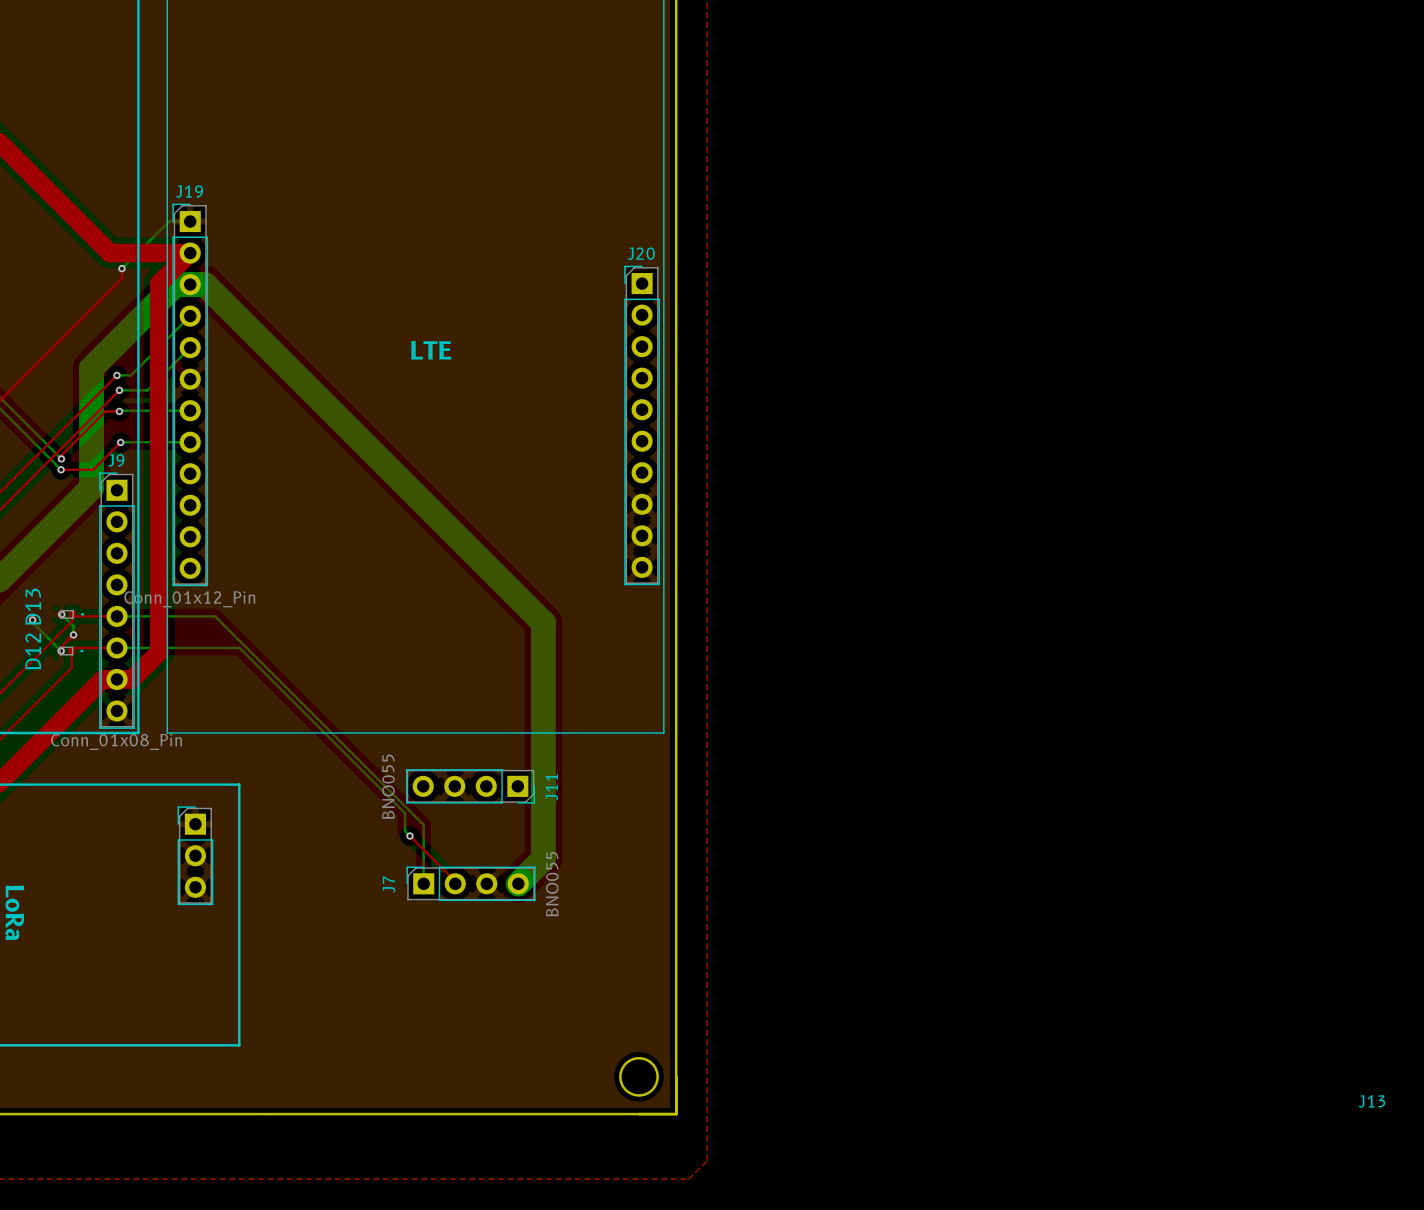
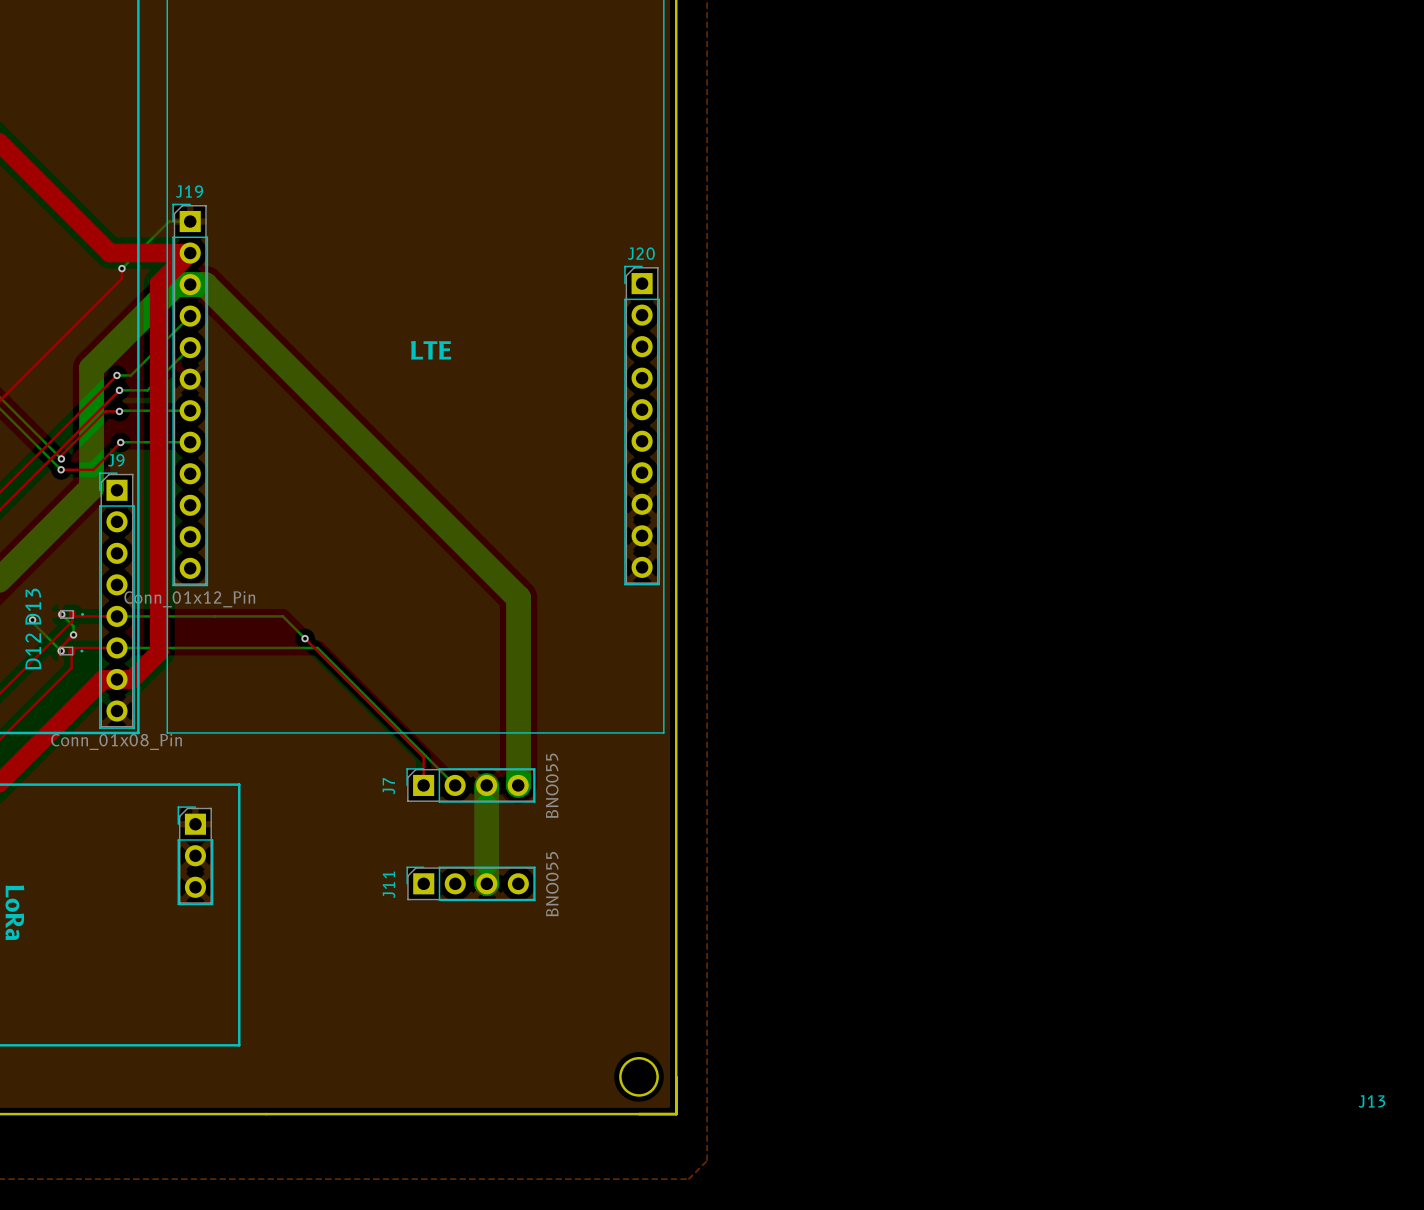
bottom track: (518, 598) (543, 622) (543, 858) (518, 884) -> (518, 598) (518, 785)
bottom track: (215, 616) (423, 824) (423, 884) -> (215, 616) (282, 616) (305, 638)
top track: none -> (305, 638) (423, 757) (423, 785)
via: none -> (305, 638)
bottom track: (239, 647) (404, 813) (404, 831) (409, 836) -> (239, 647) (317, 647) (455, 785)
J7: none -> BNO055 (470, 785)
bottom track: none -> (486, 785) (487, 883)
J11: BNO055 (470, 786) -> none
top track: (409, 836) (455, 881) -> none
via: (409, 836) -> none
J7 name: J7 (388, 884) -> J11 (388, 884)

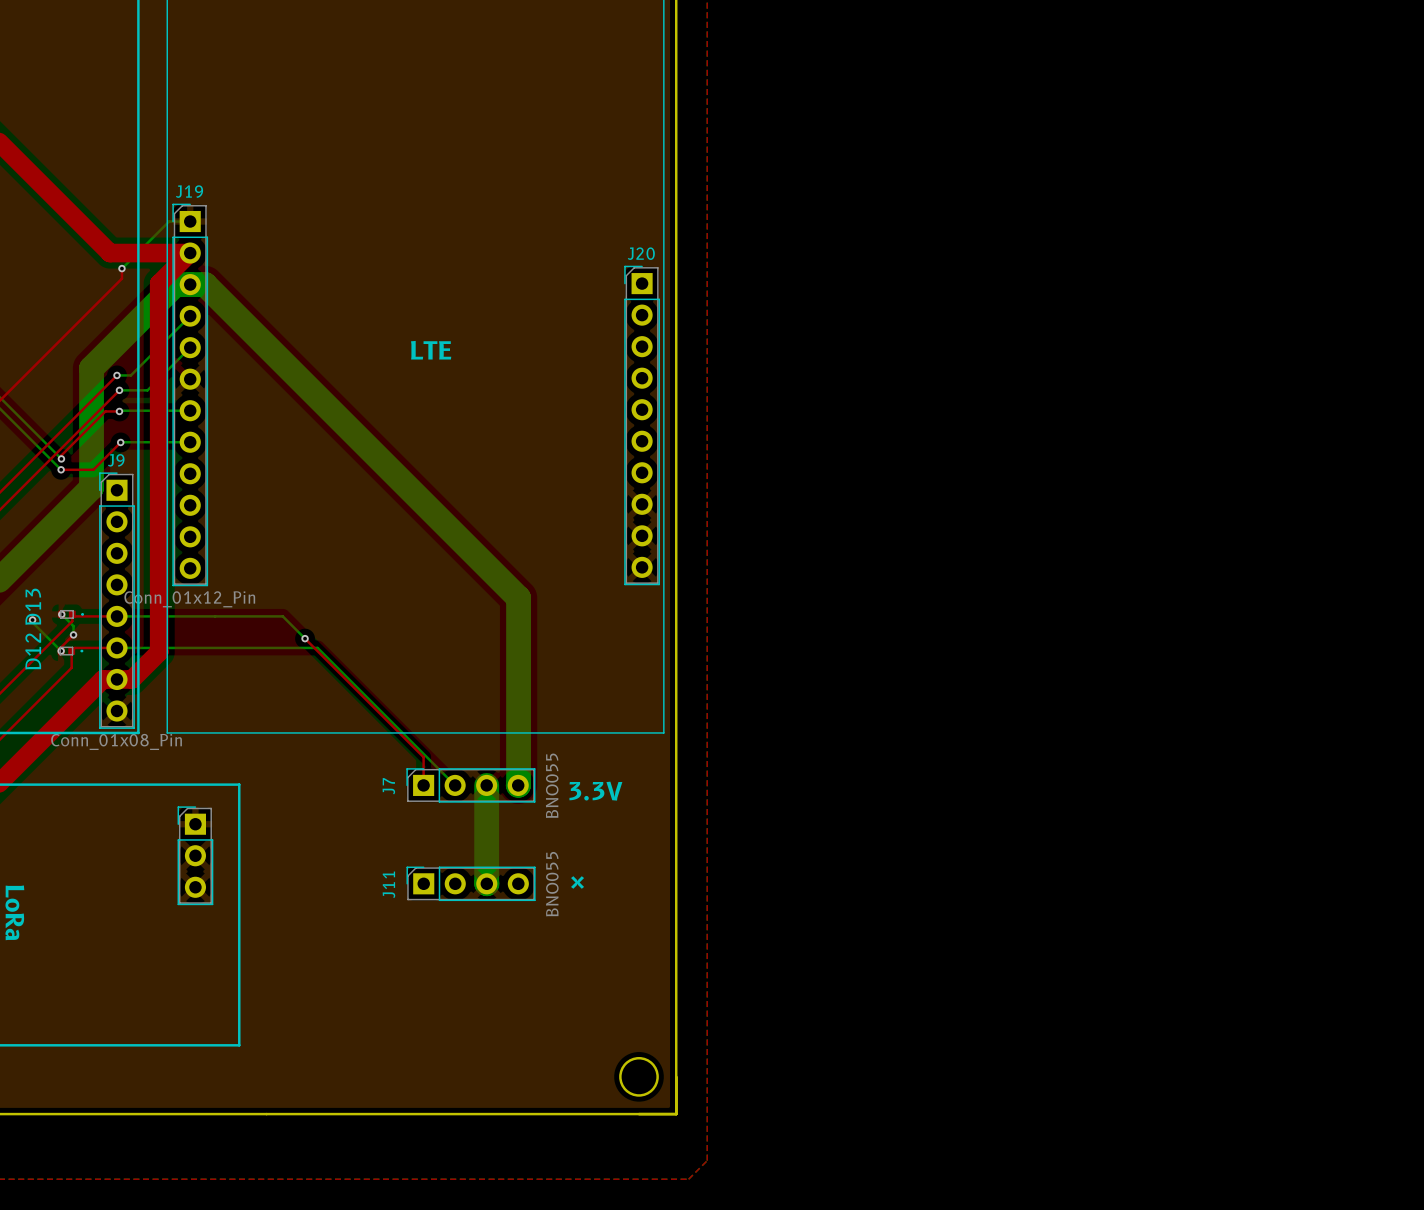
text: none -> 3.3V (595, 791)
text: none -> × (577, 882)
J13 name: J13 (1371, 1101) -> none

